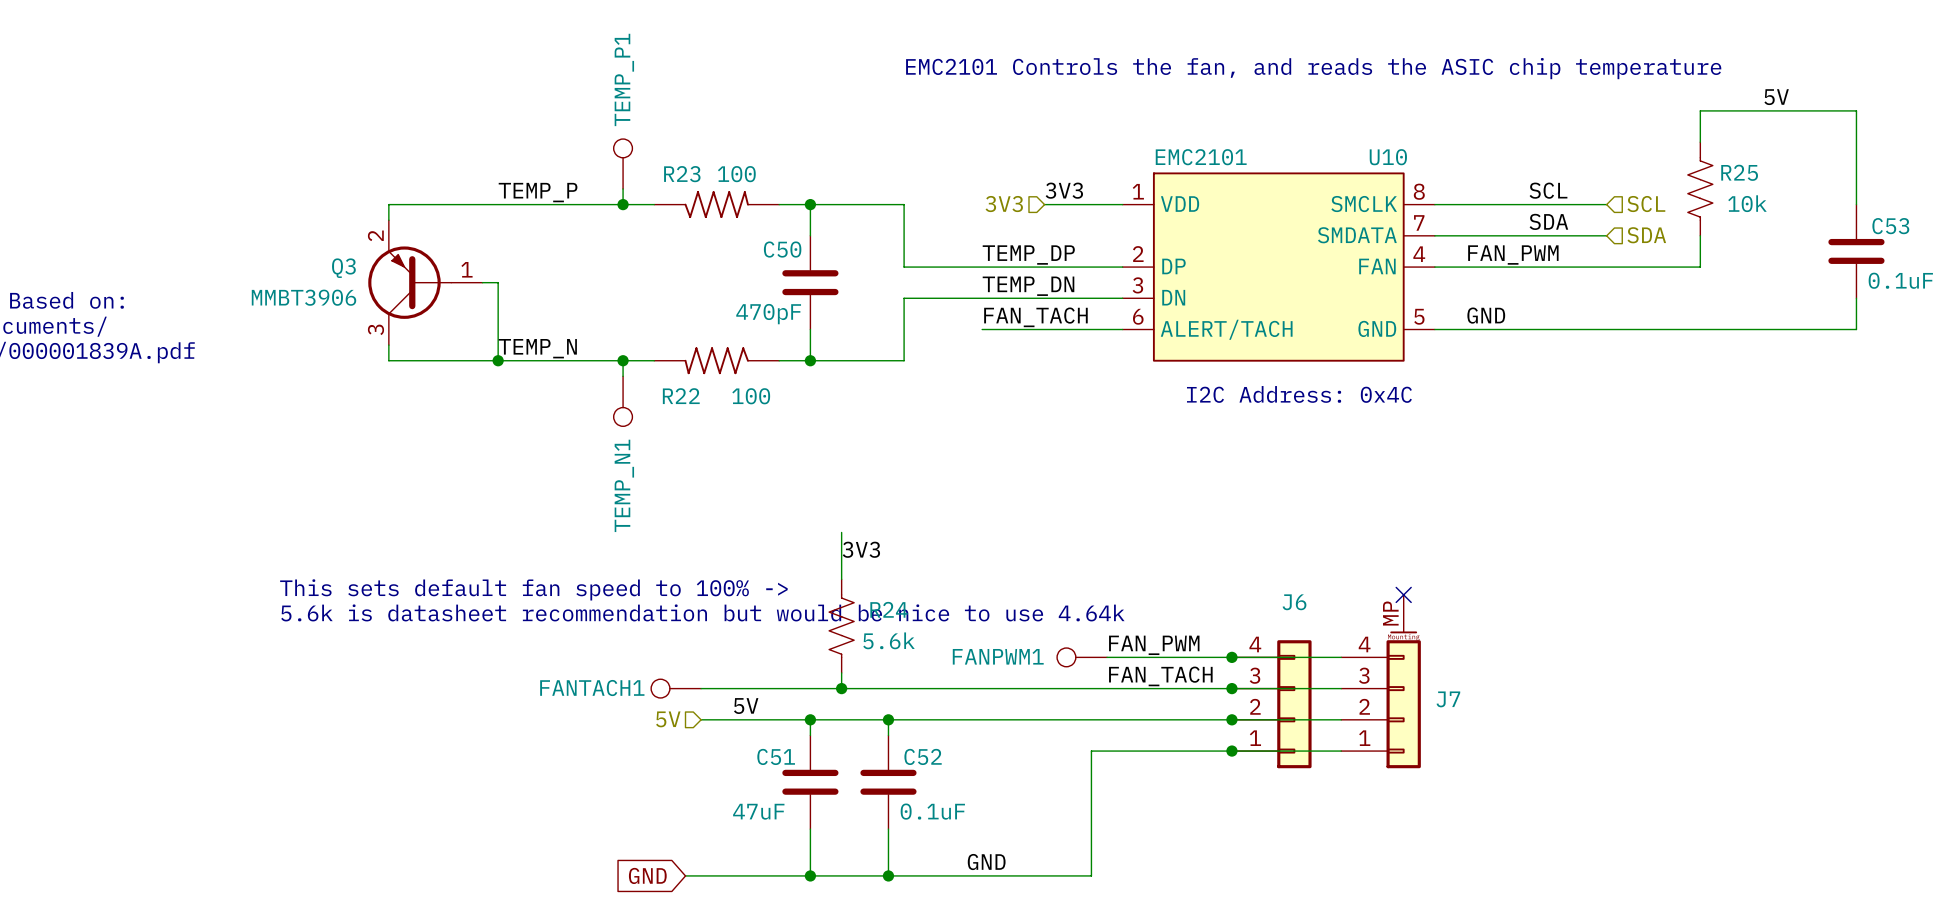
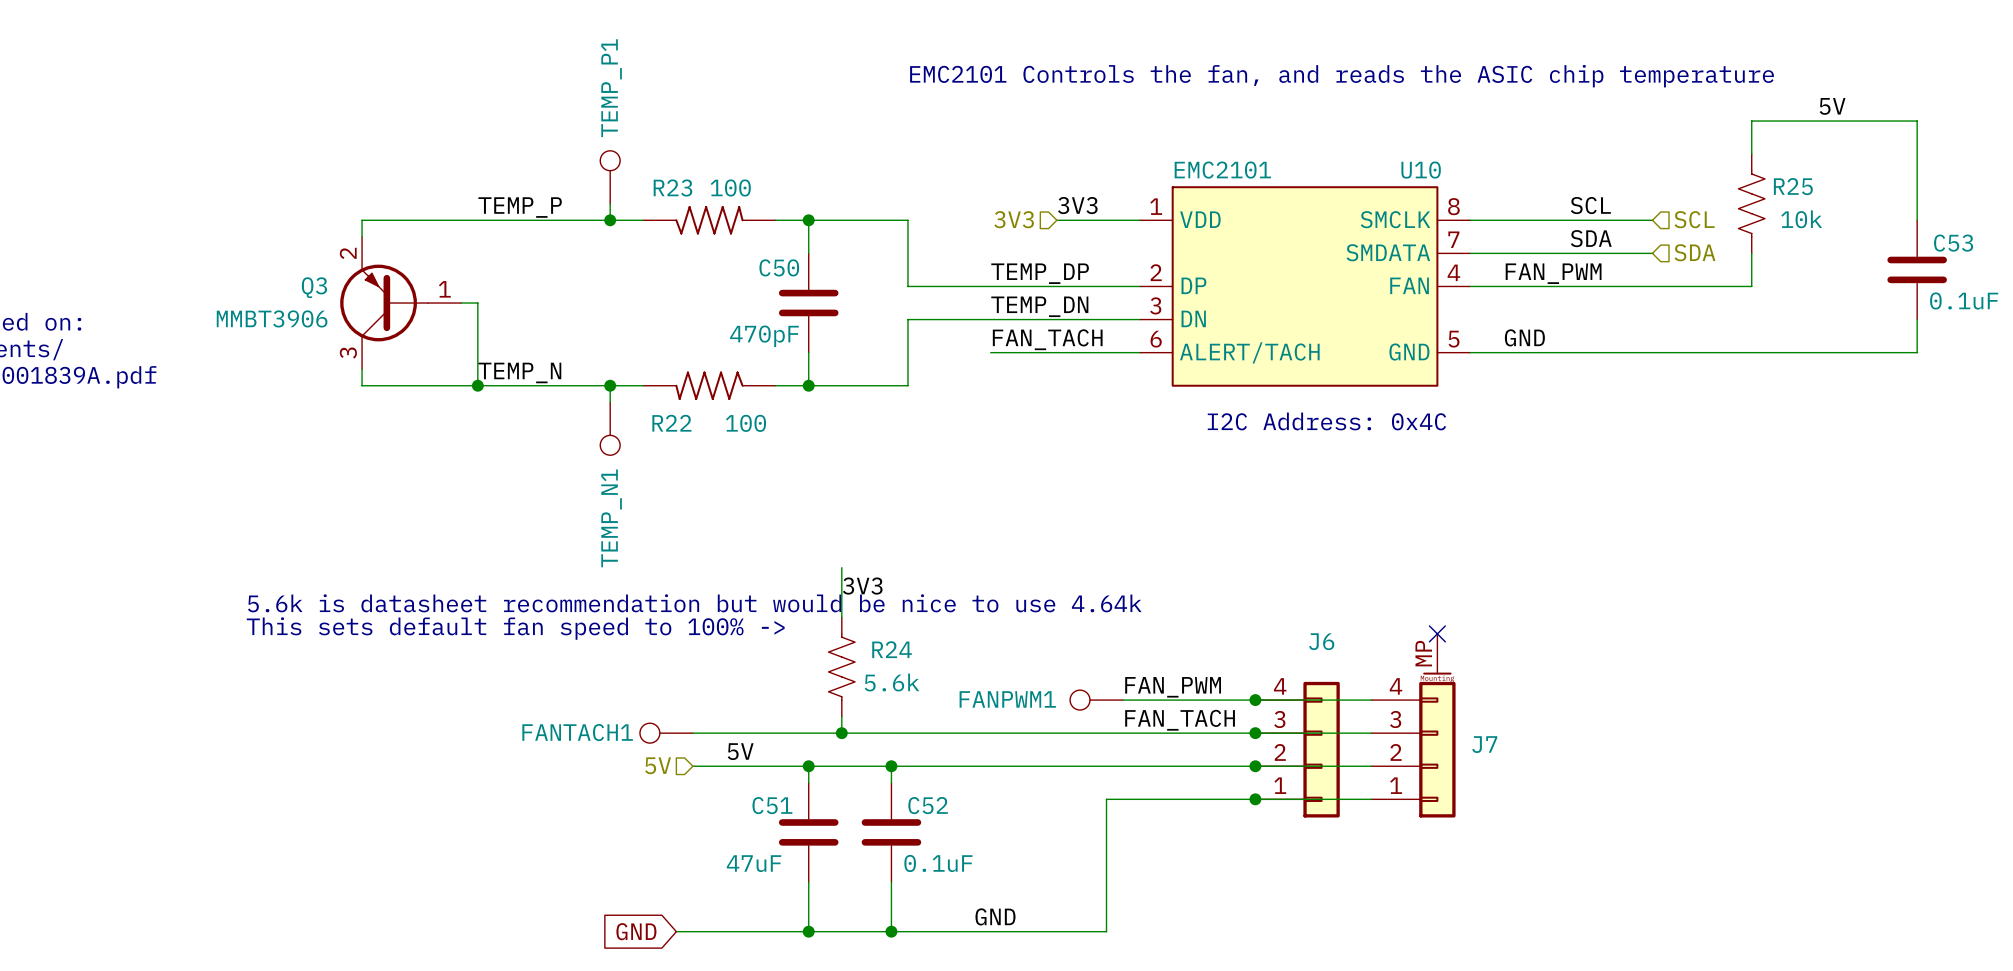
text position: 5.6k is datasheet recommendation but would be nice to use 4.64k (702, 612) -> 5.6k is datasheet recommendation but would be nice to use 4.64k (694, 603)

